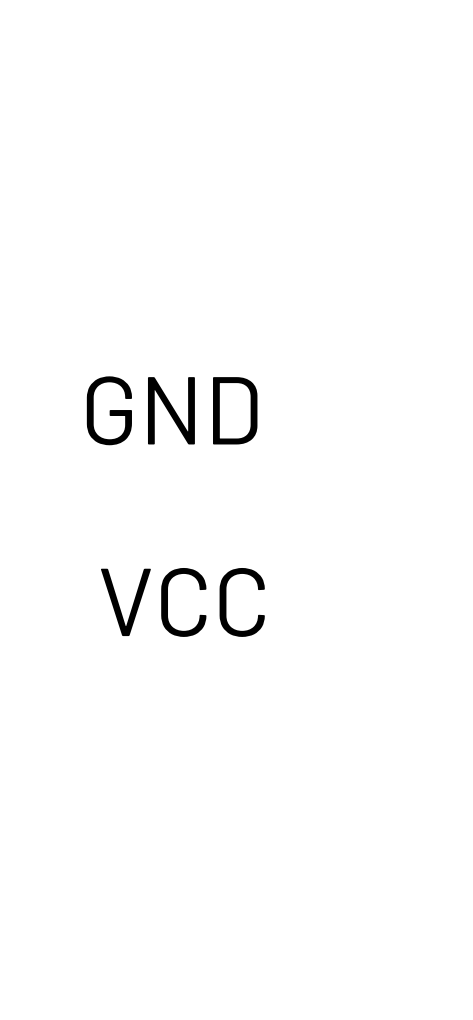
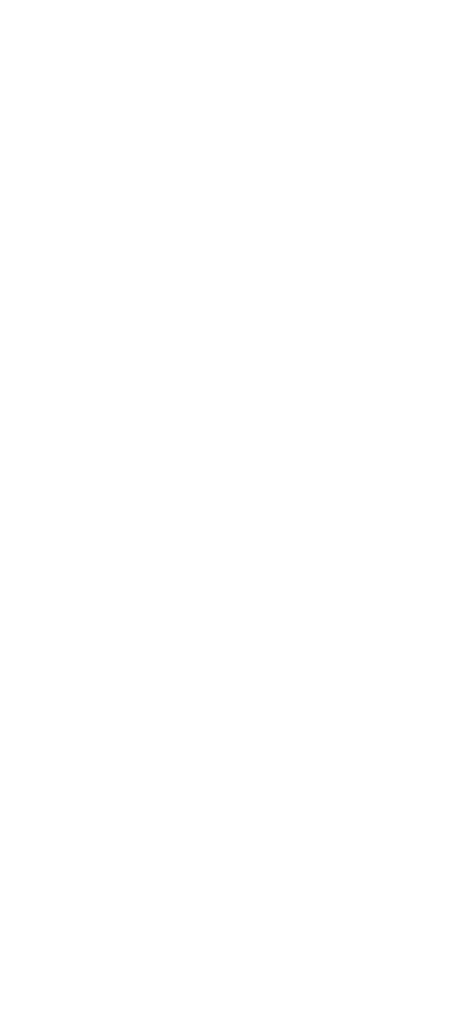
text: GND (172, 410) -> none
text: VCC (182, 602) -> none

